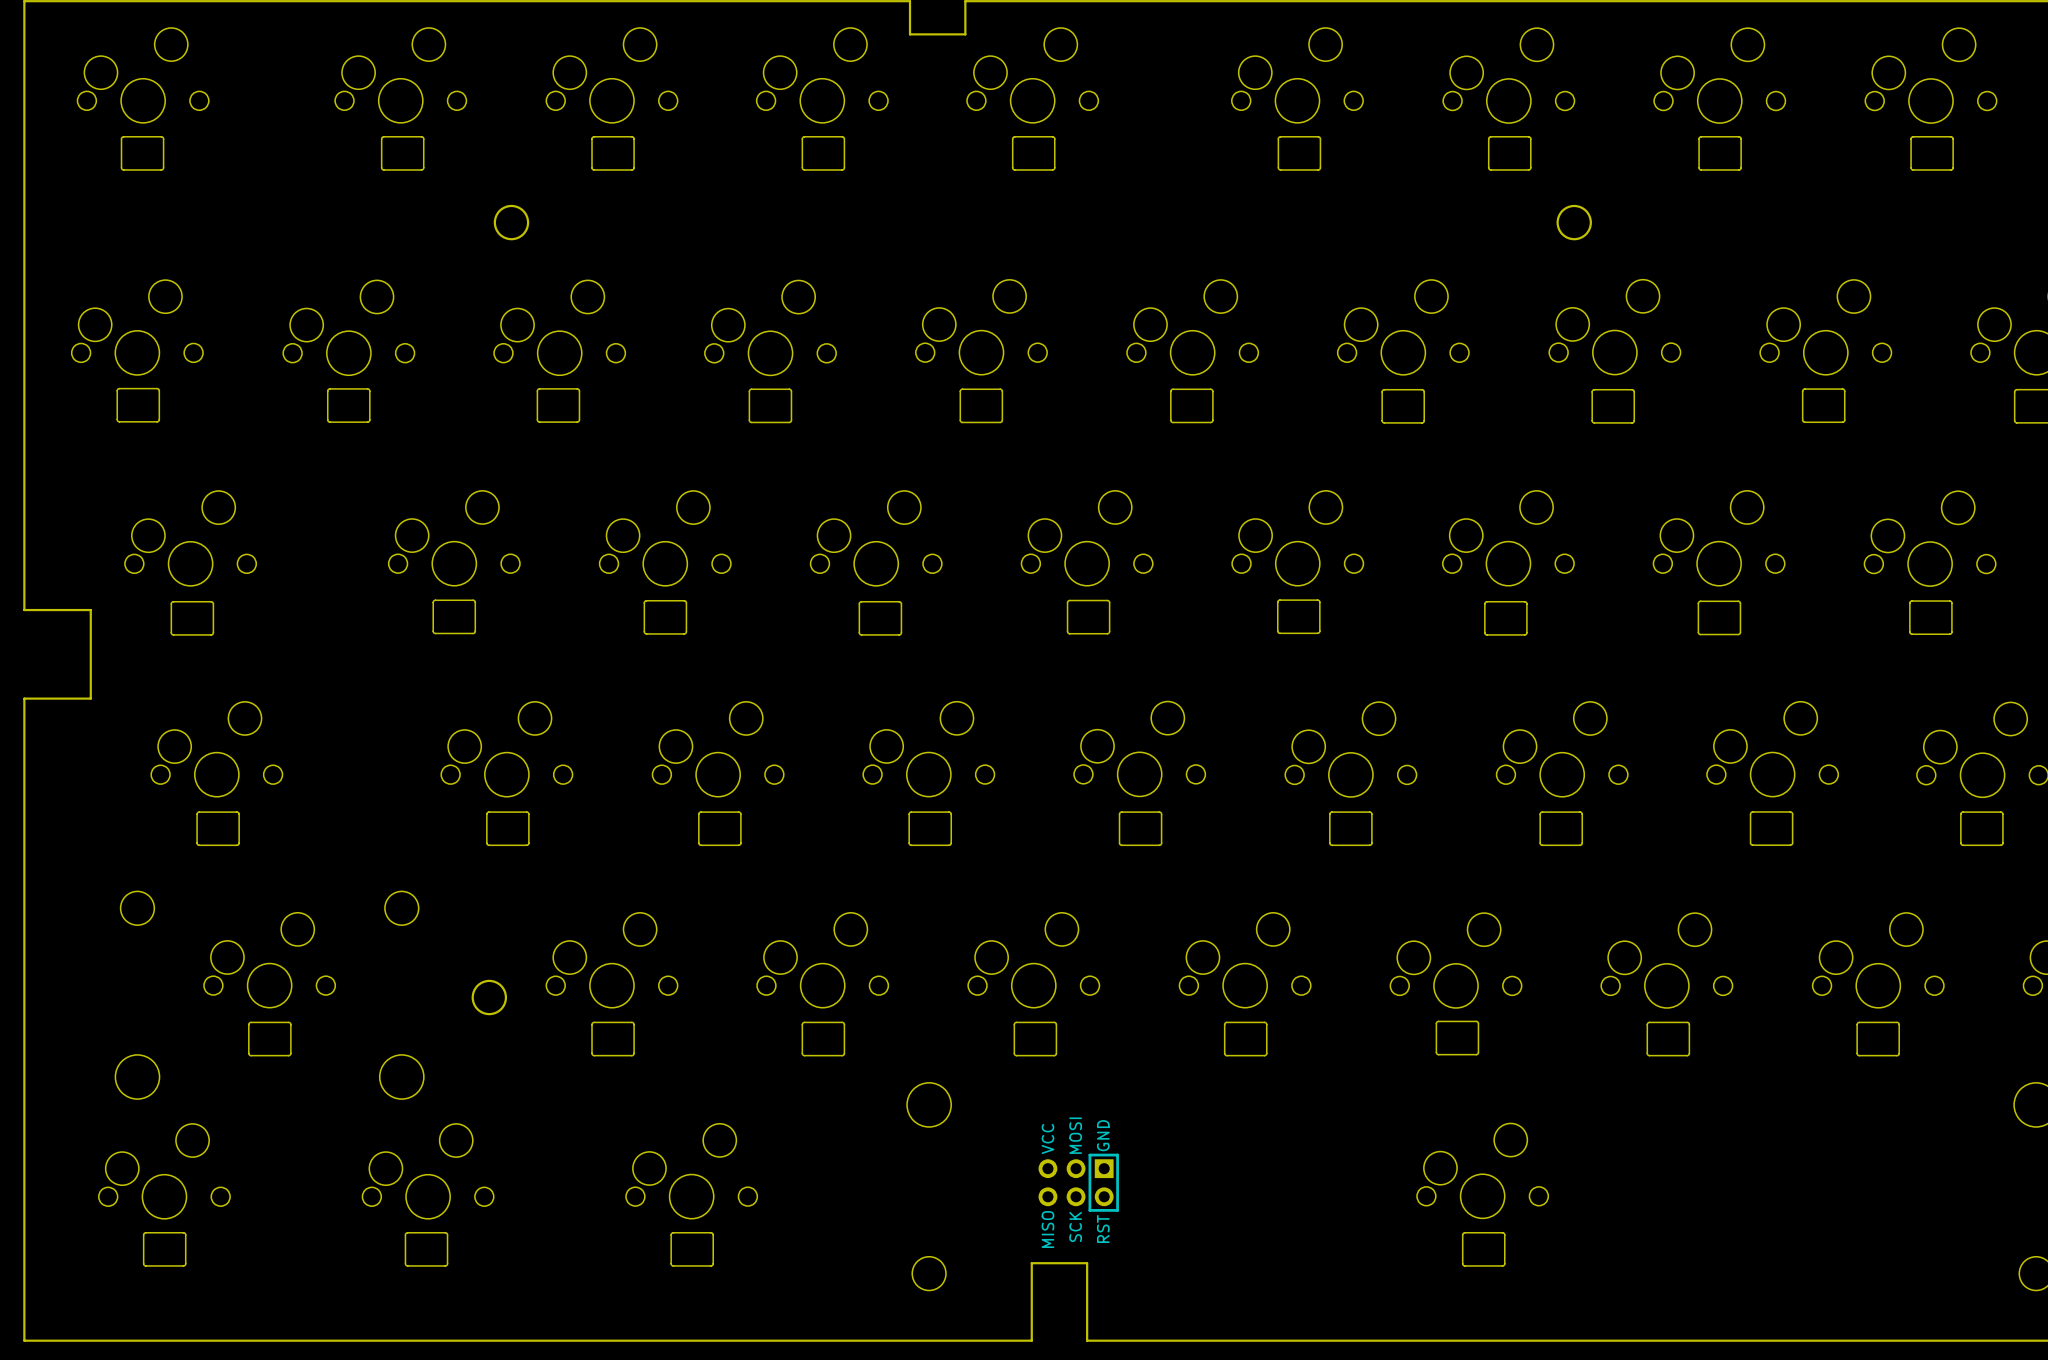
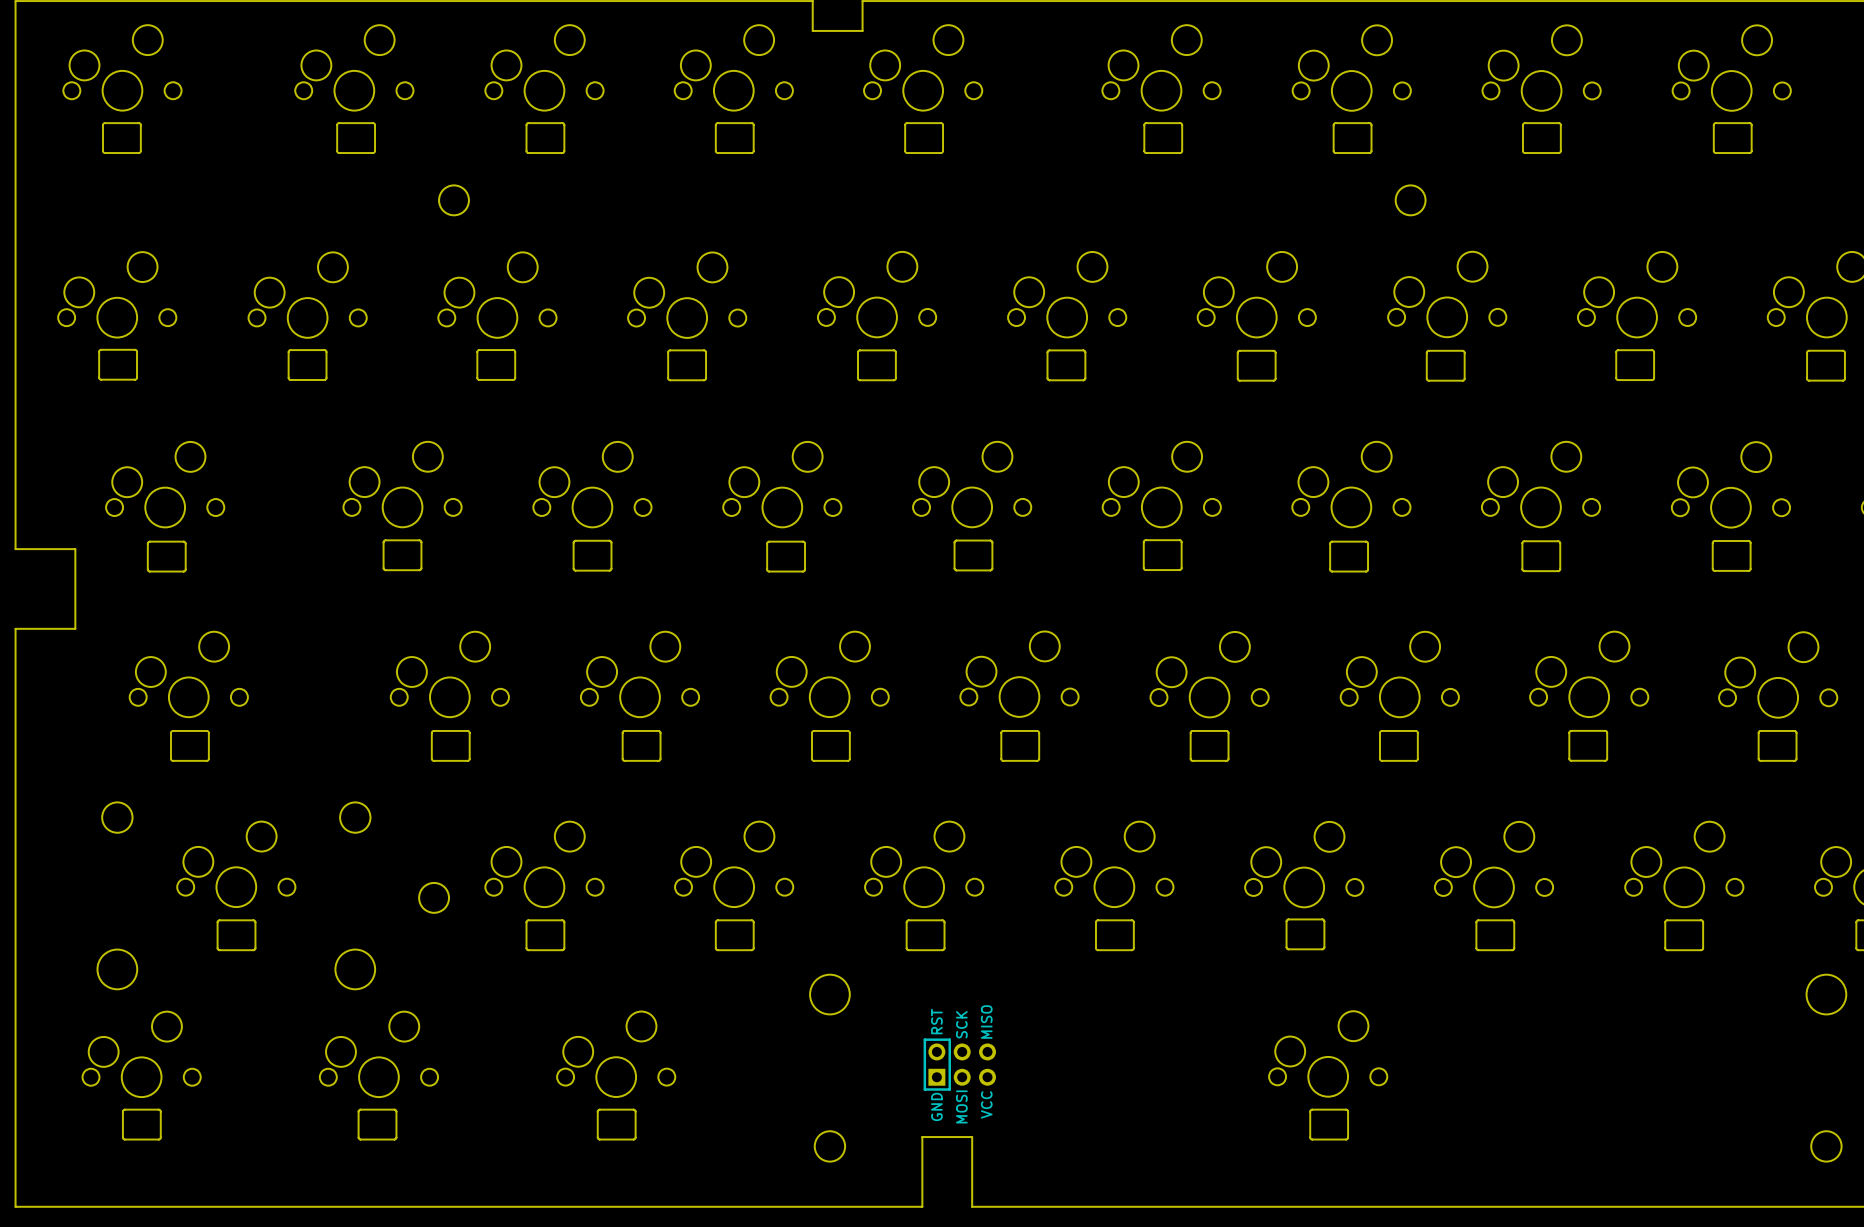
part rotation: 0° (1078, 1182) -> 180° (959, 1064)

